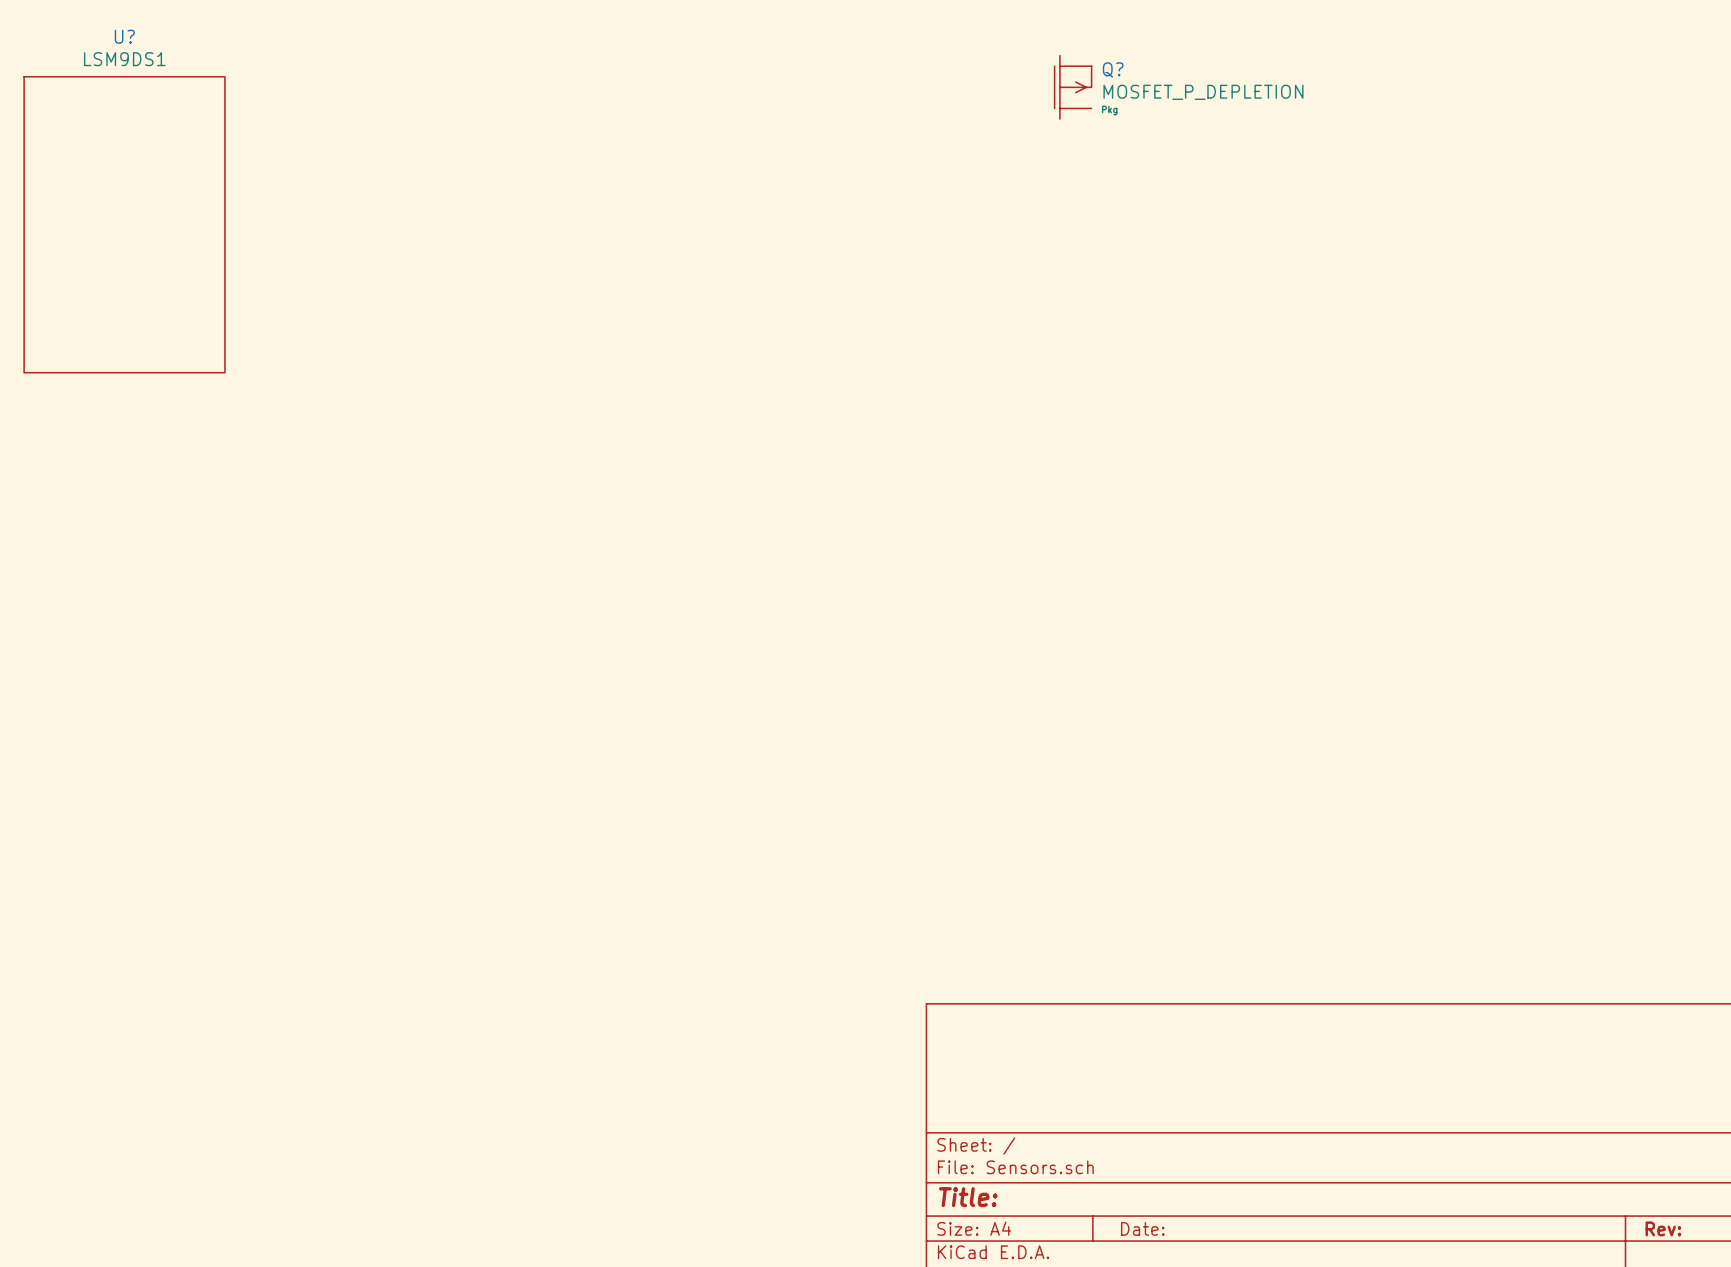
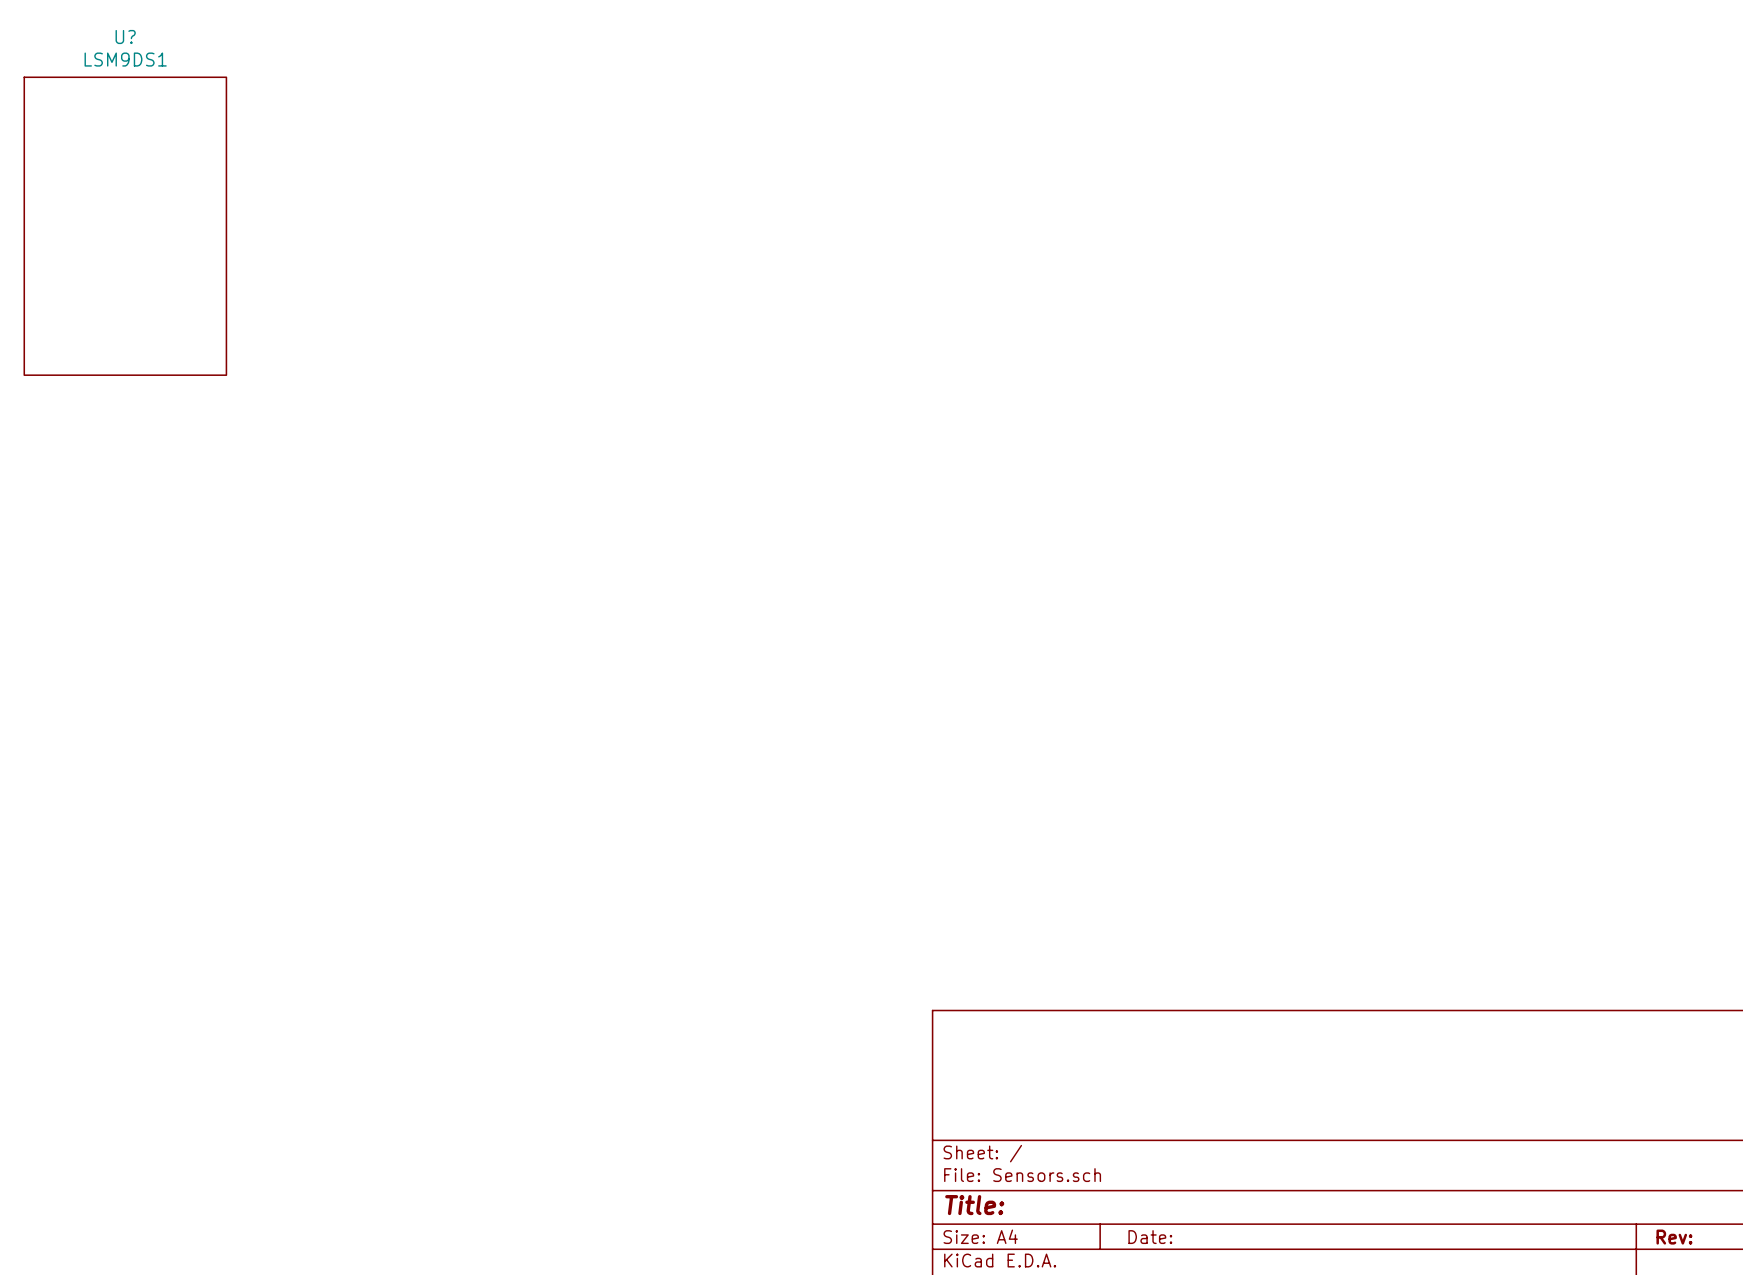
Q?: MOSFET_P_DEPLETION (1073, 87) -> none

